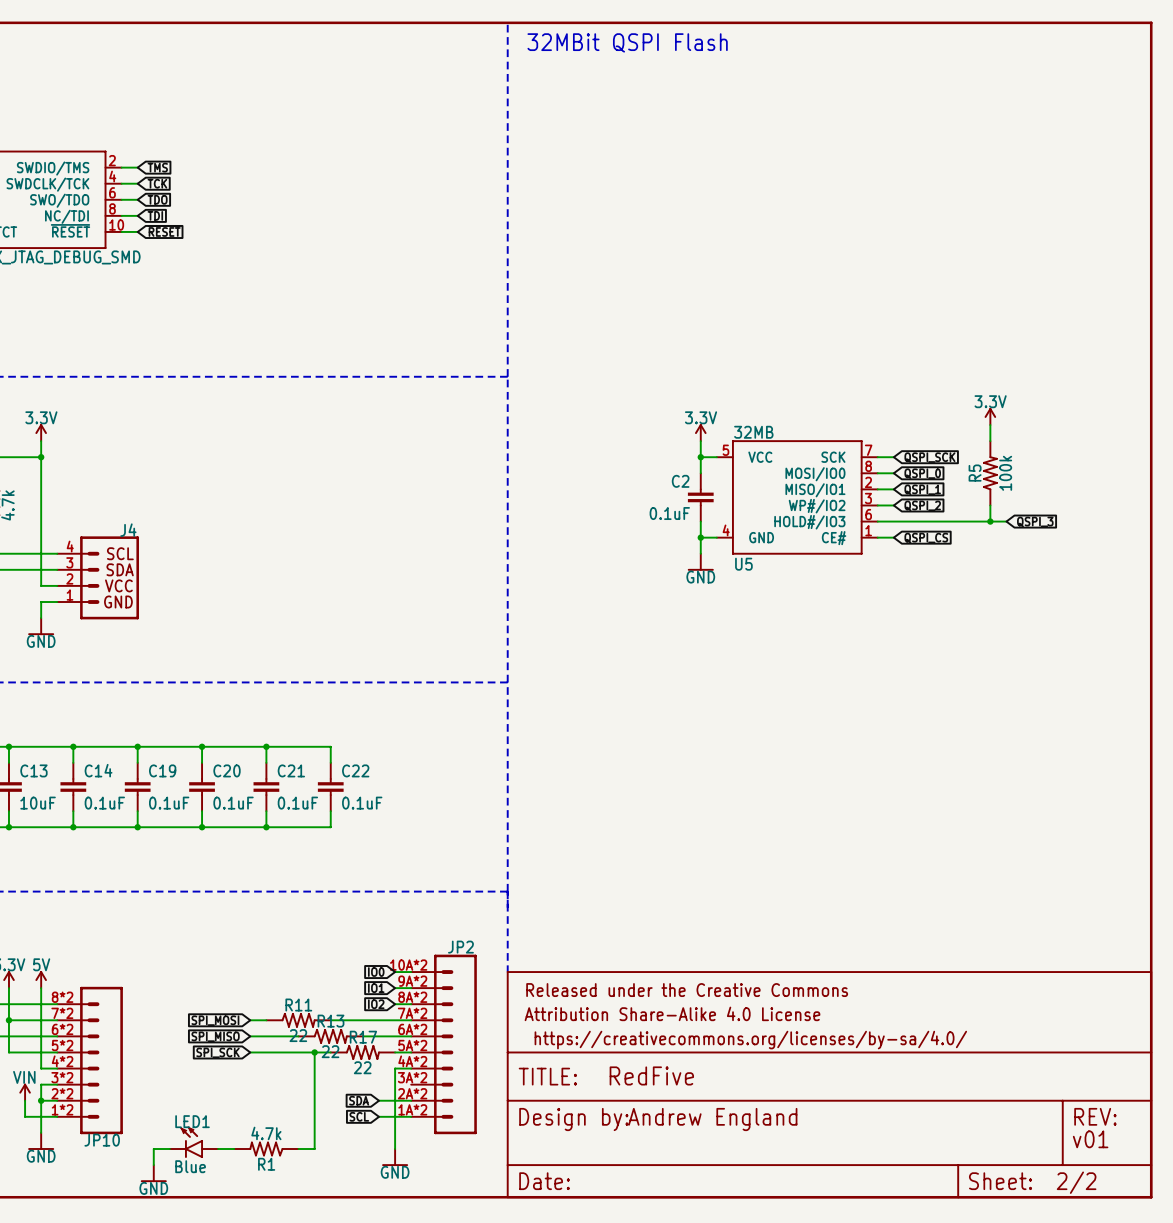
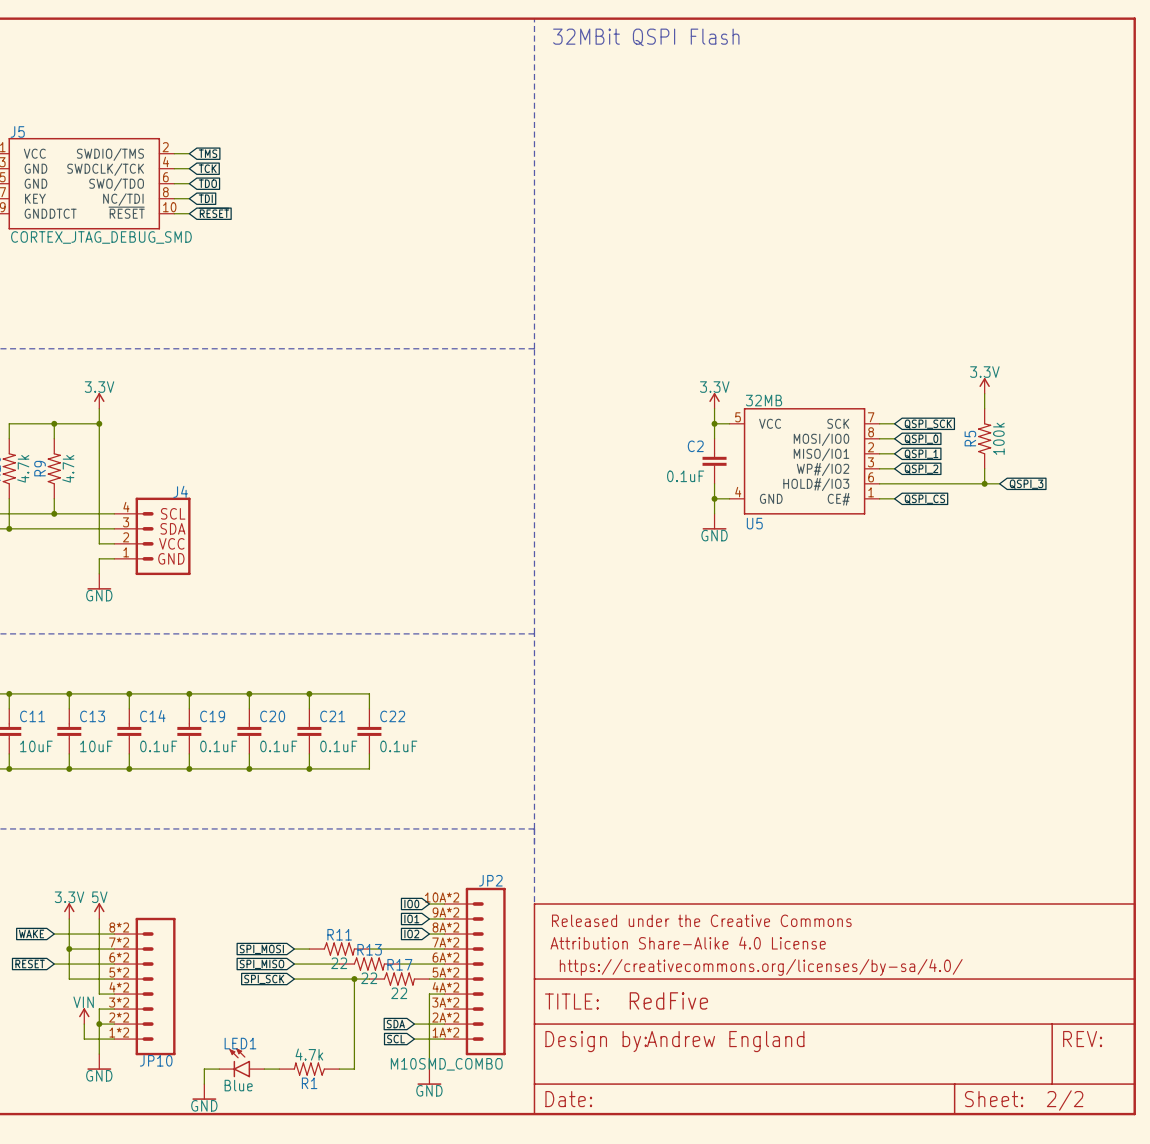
text: v01 (1090, 1139) -> none
JP2 value: none -> M10SMD_COMBO (446, 1064)

